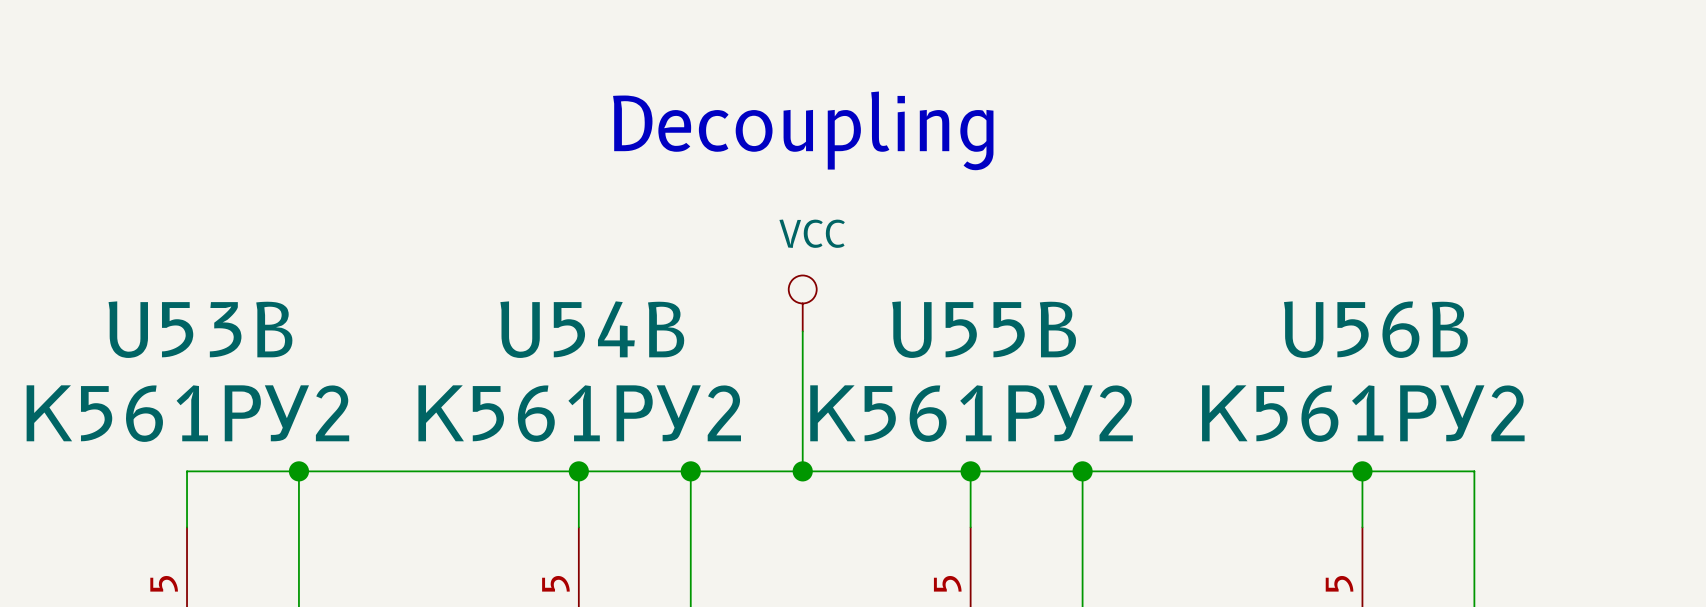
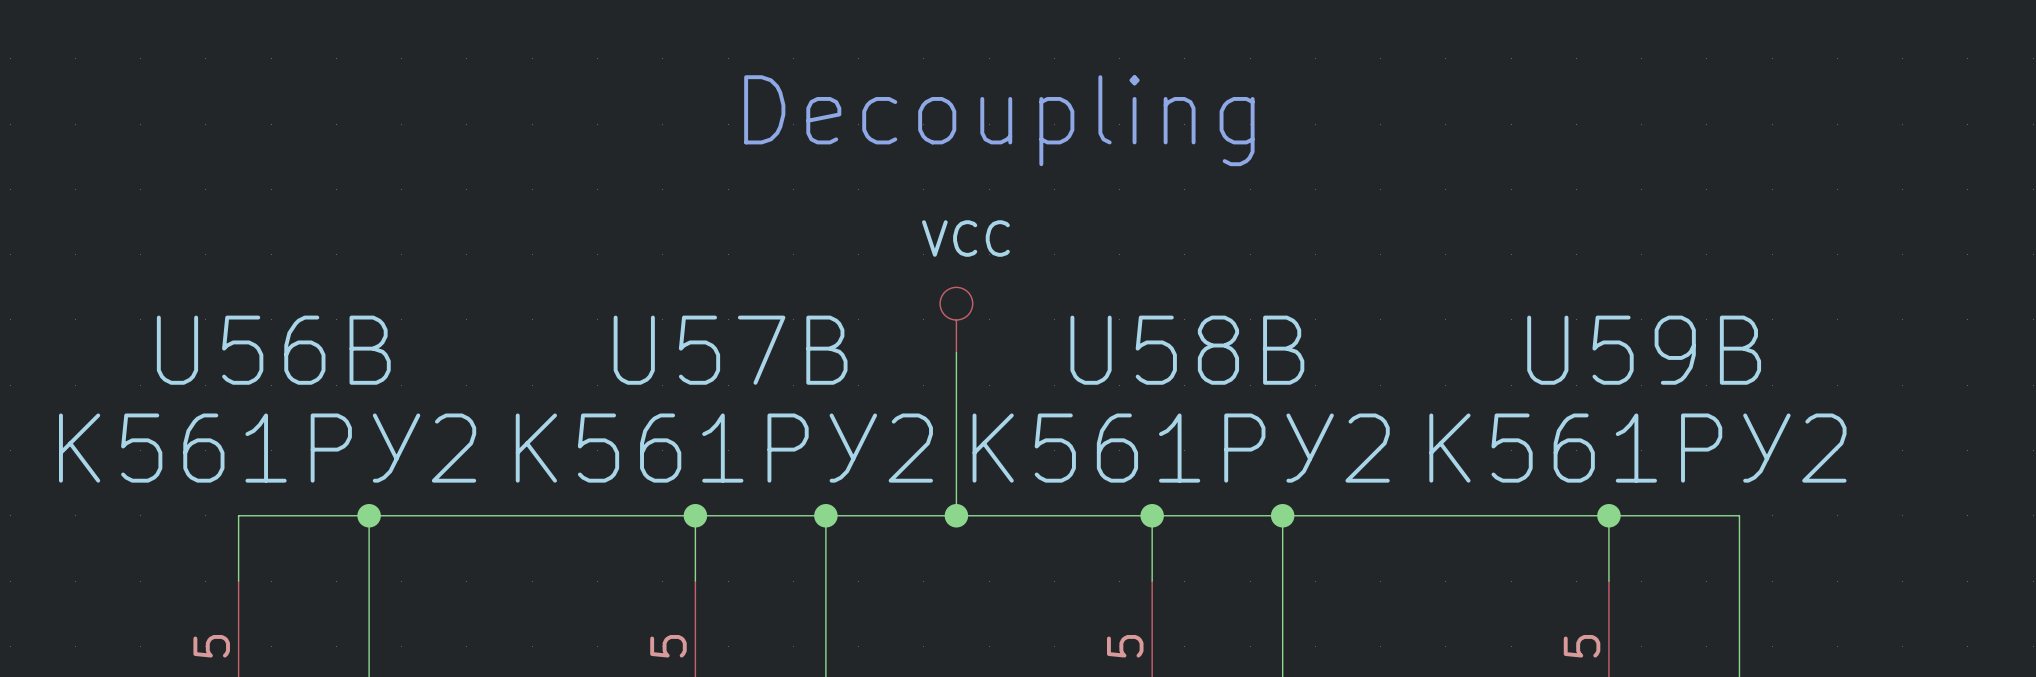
U53B name: U53B (200, 329) -> U56B (273, 350)
U54B name: U54B (592, 329) -> U57B (730, 350)
U55B name: U55B (984, 329) -> U58B (1187, 350)
U56B name: U56B (1375, 329) -> U59B (1644, 350)

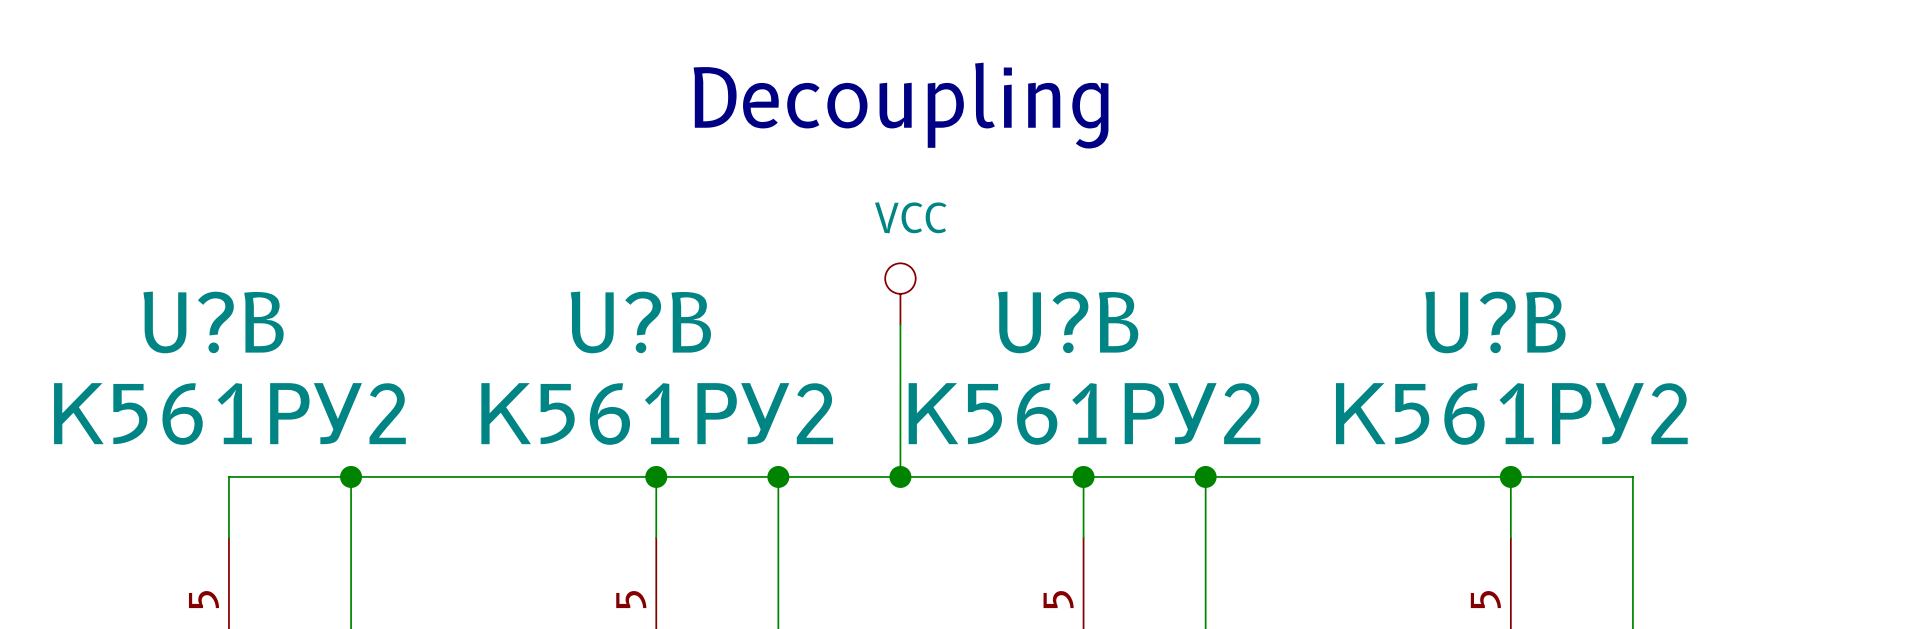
U56B name: U56B (273, 350) -> U?B (213, 322)
U57B name: U57B (730, 350) -> U?B (640, 322)
U58B name: U58B (1187, 350) -> U?B (1068, 322)
U59B name: U59B (1644, 350) -> U?B (1495, 322)

